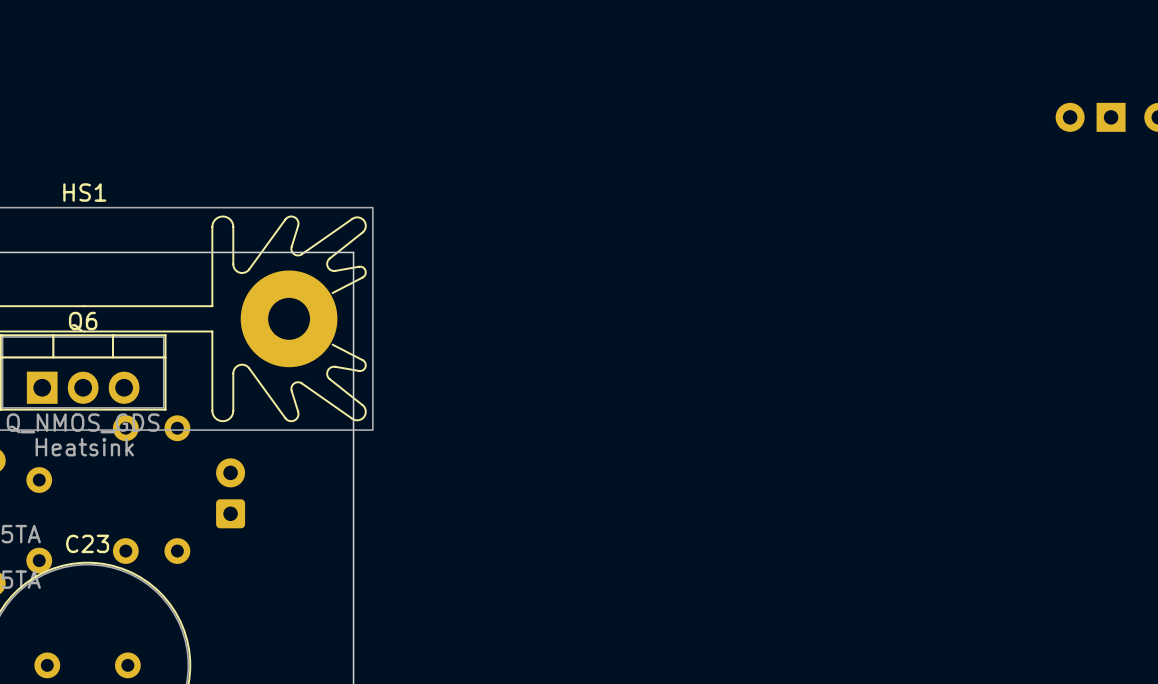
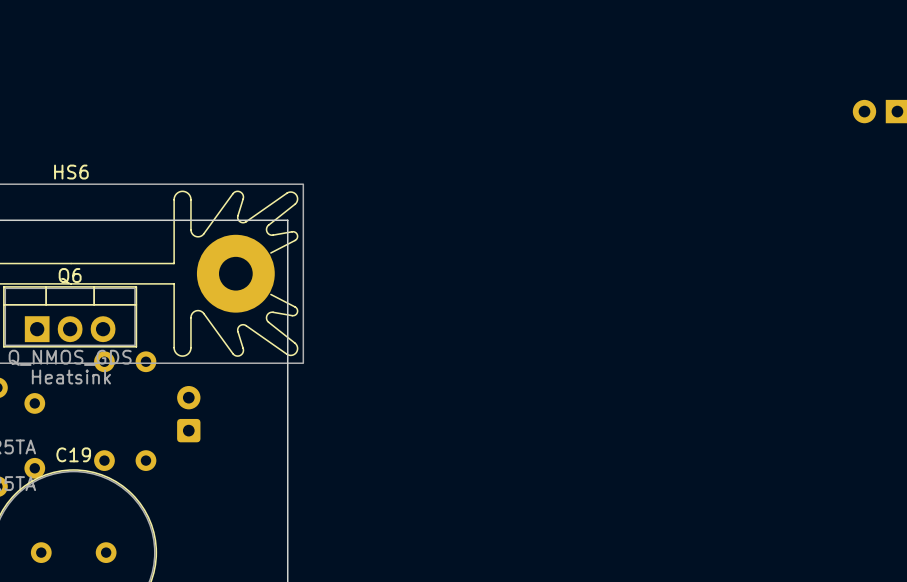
HS1 name: HS1 (84, 192) -> HS6 (71, 172)
C23 name: C23 (87, 543) -> C19 (73, 454)

